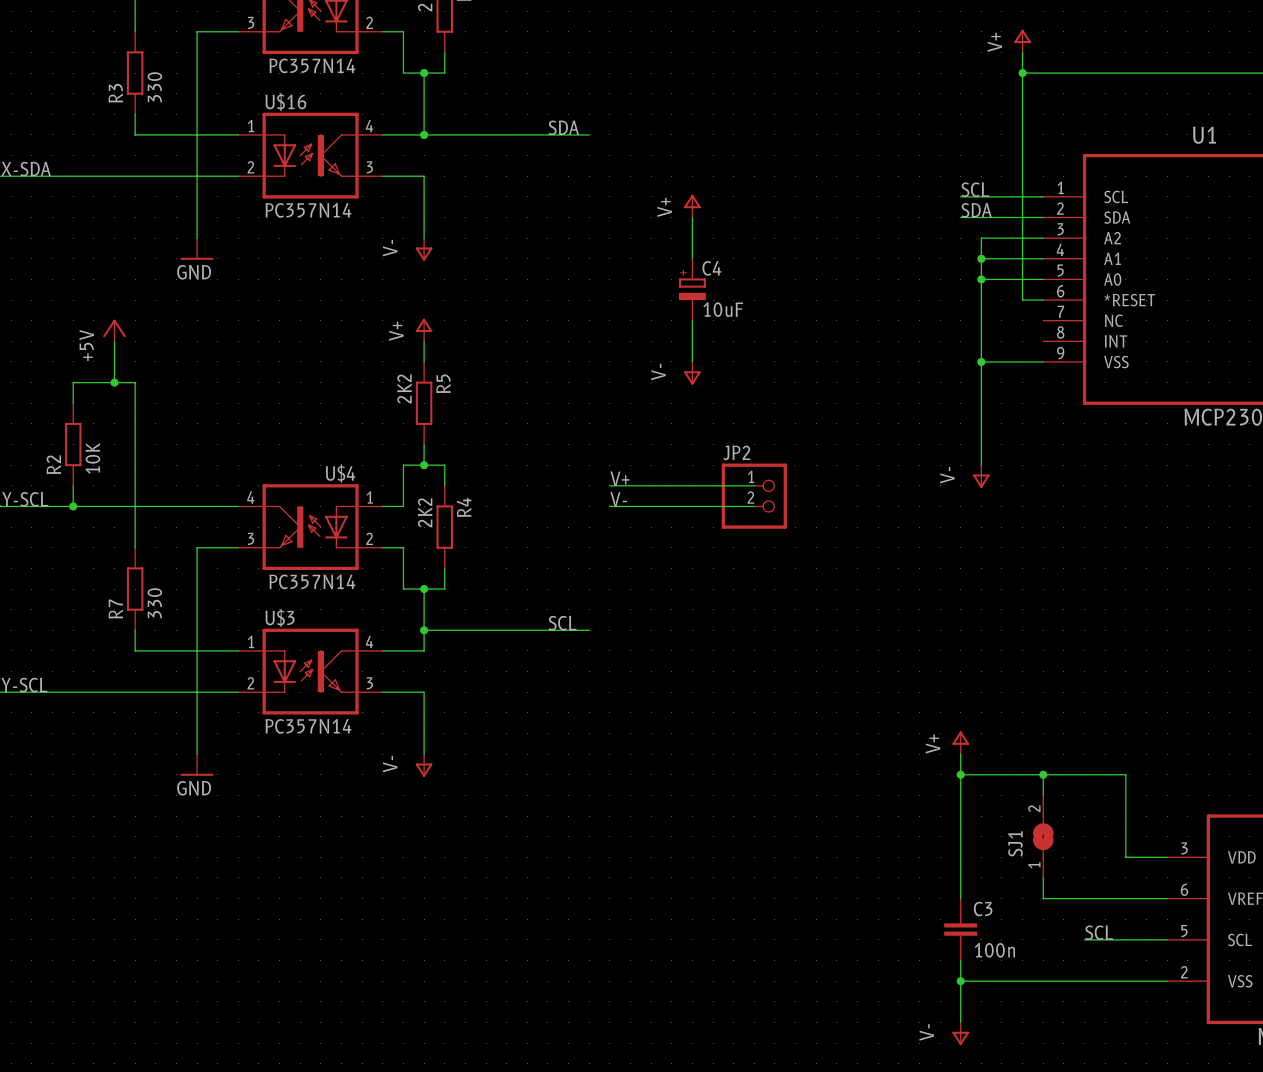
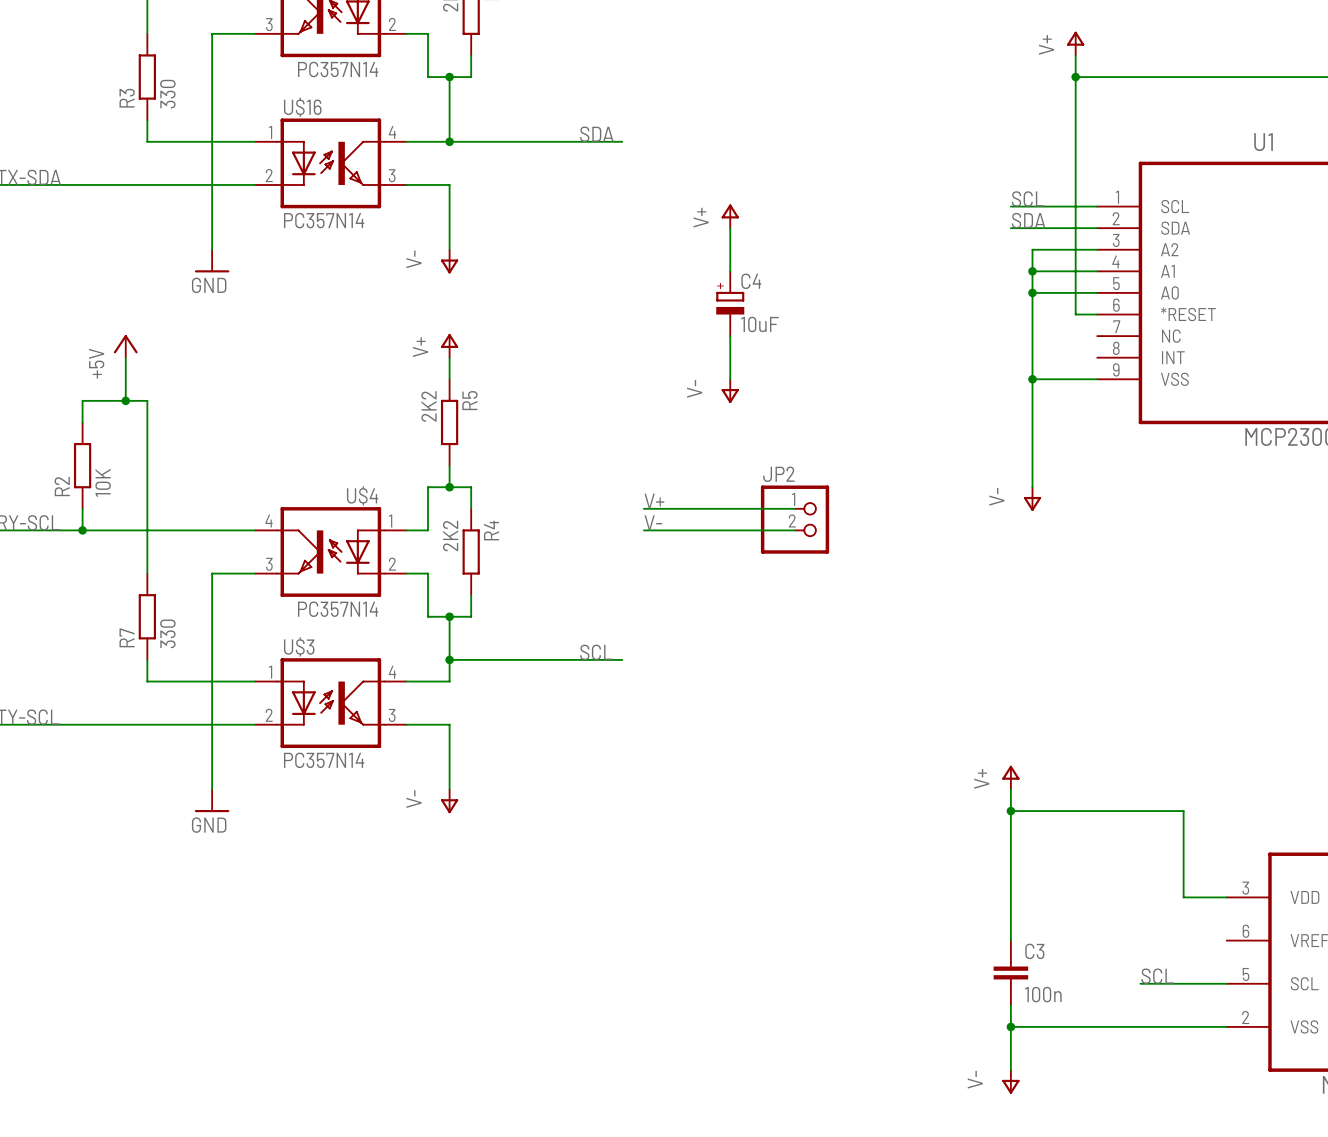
wire: (1043, 774) (1043, 795) -> none
junction: (1043, 774) -> none
SJ1: (1043, 836) -> none
wire: (1043, 877) (1043, 898) (1167, 898) -> none

